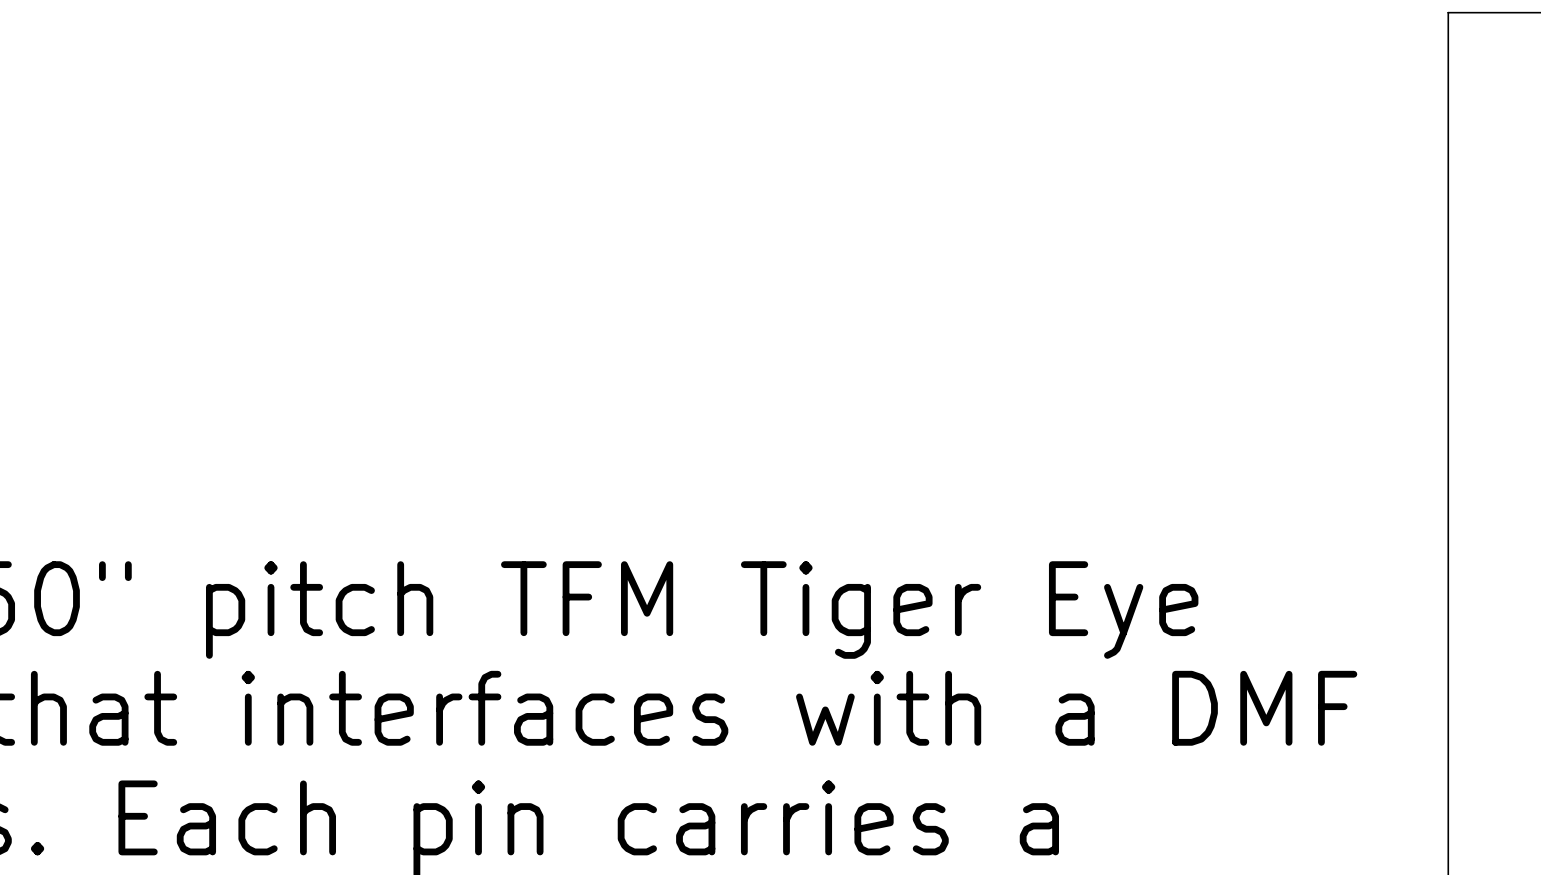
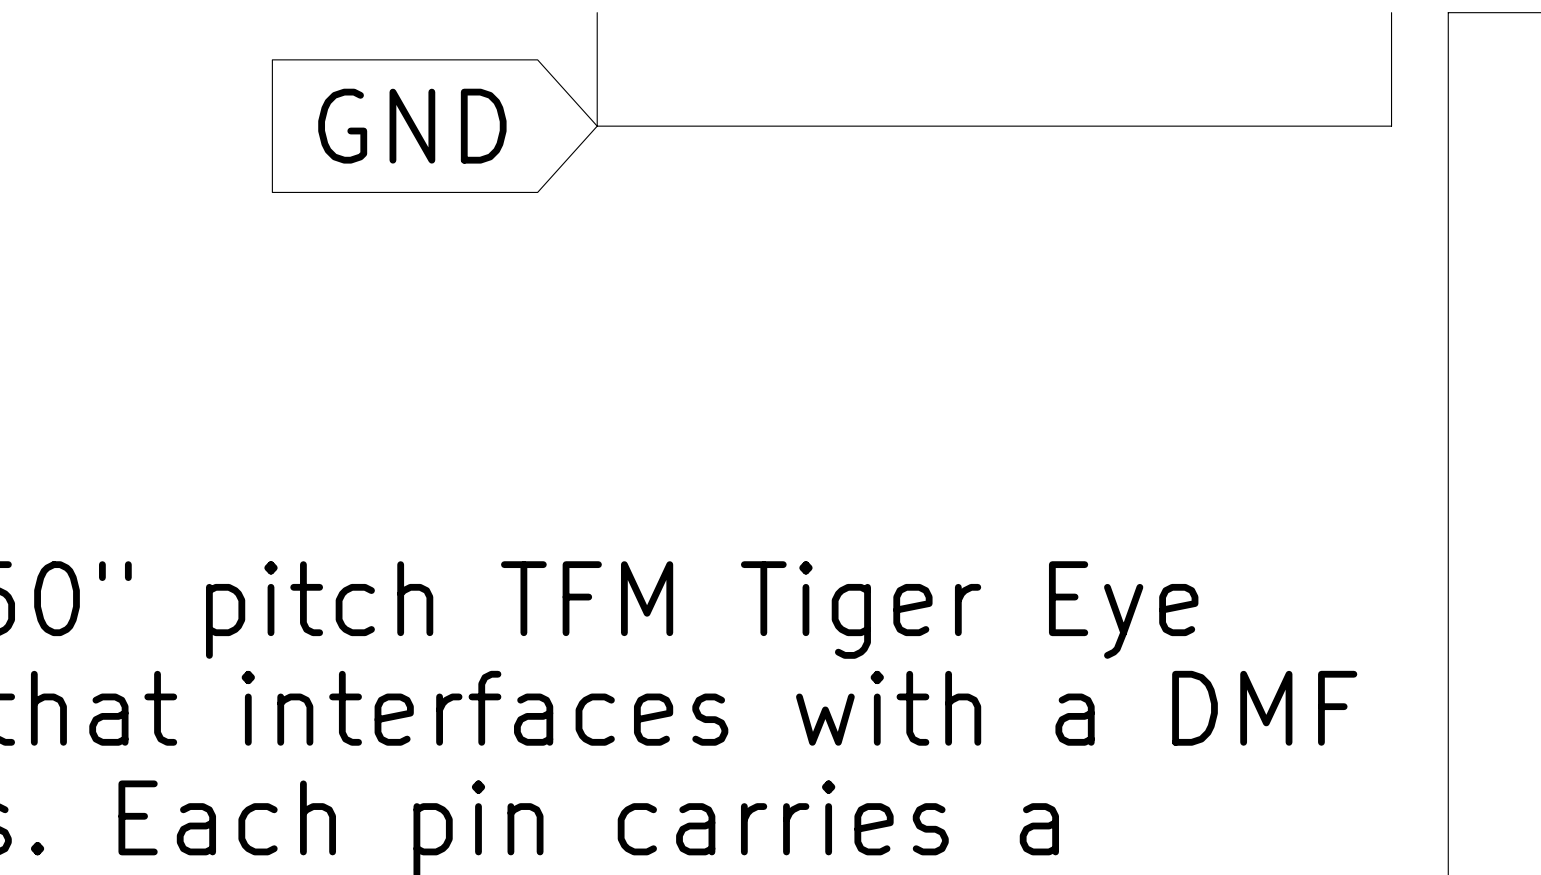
wire: none -> (597, 12) (597, 126) (1391, 126) (1391, 12)
global label: none -> GND (412, 126)

